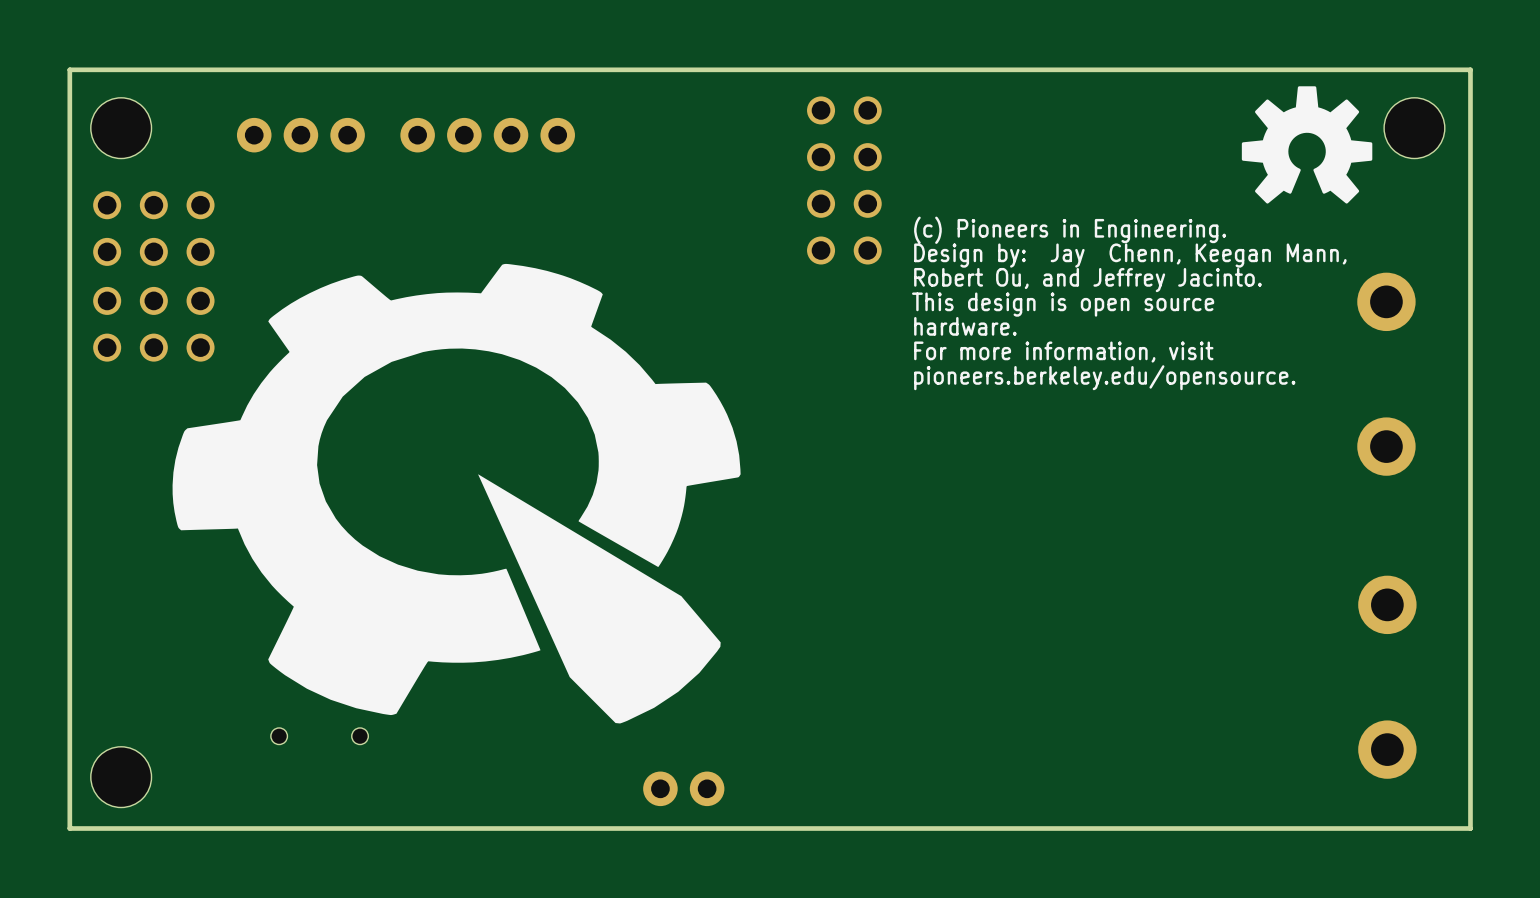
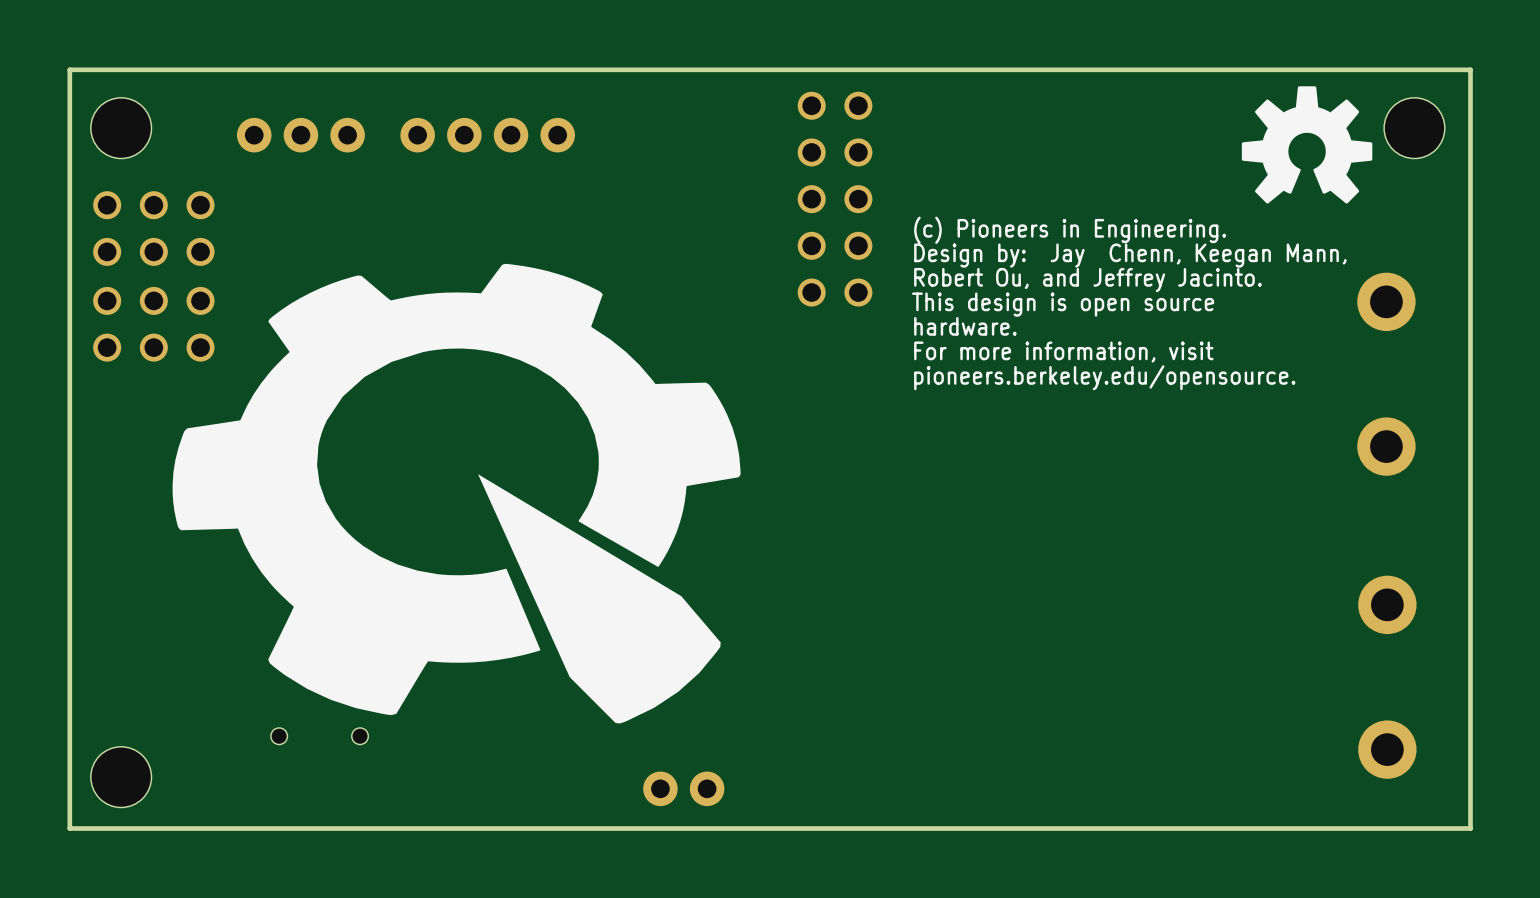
part: (844, 180) -> none
part: none -> (835, 199)

